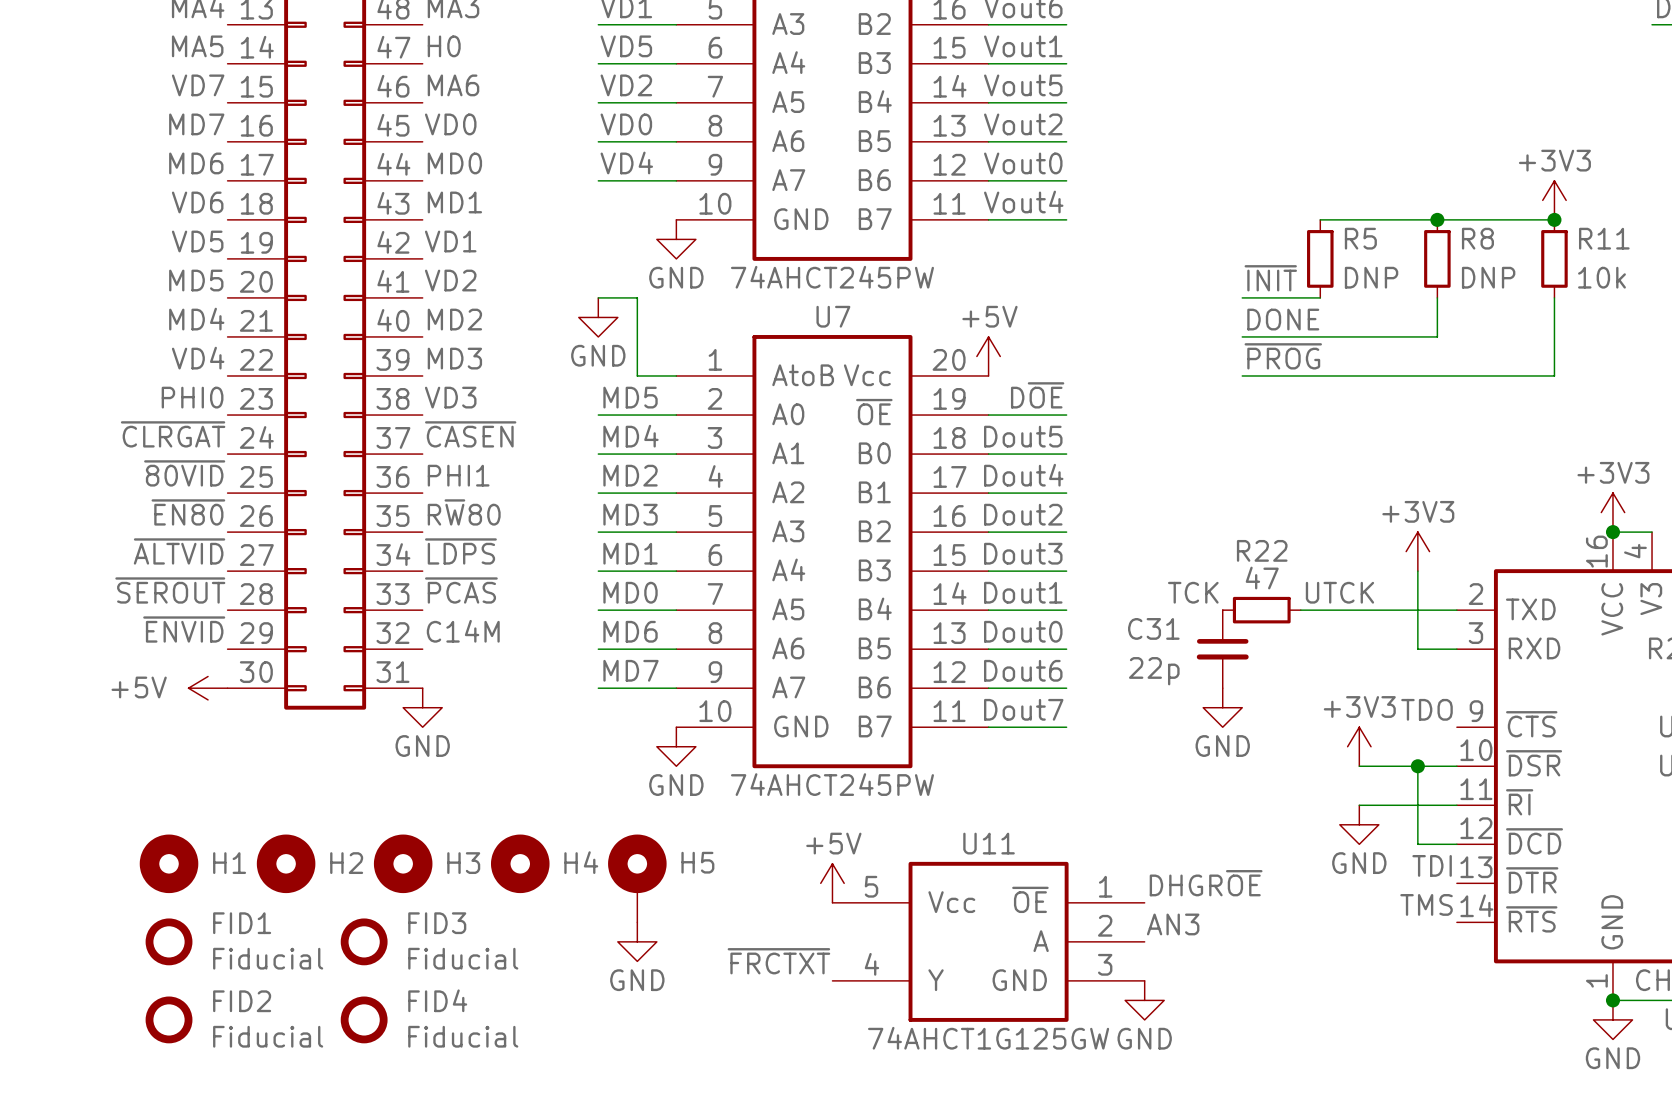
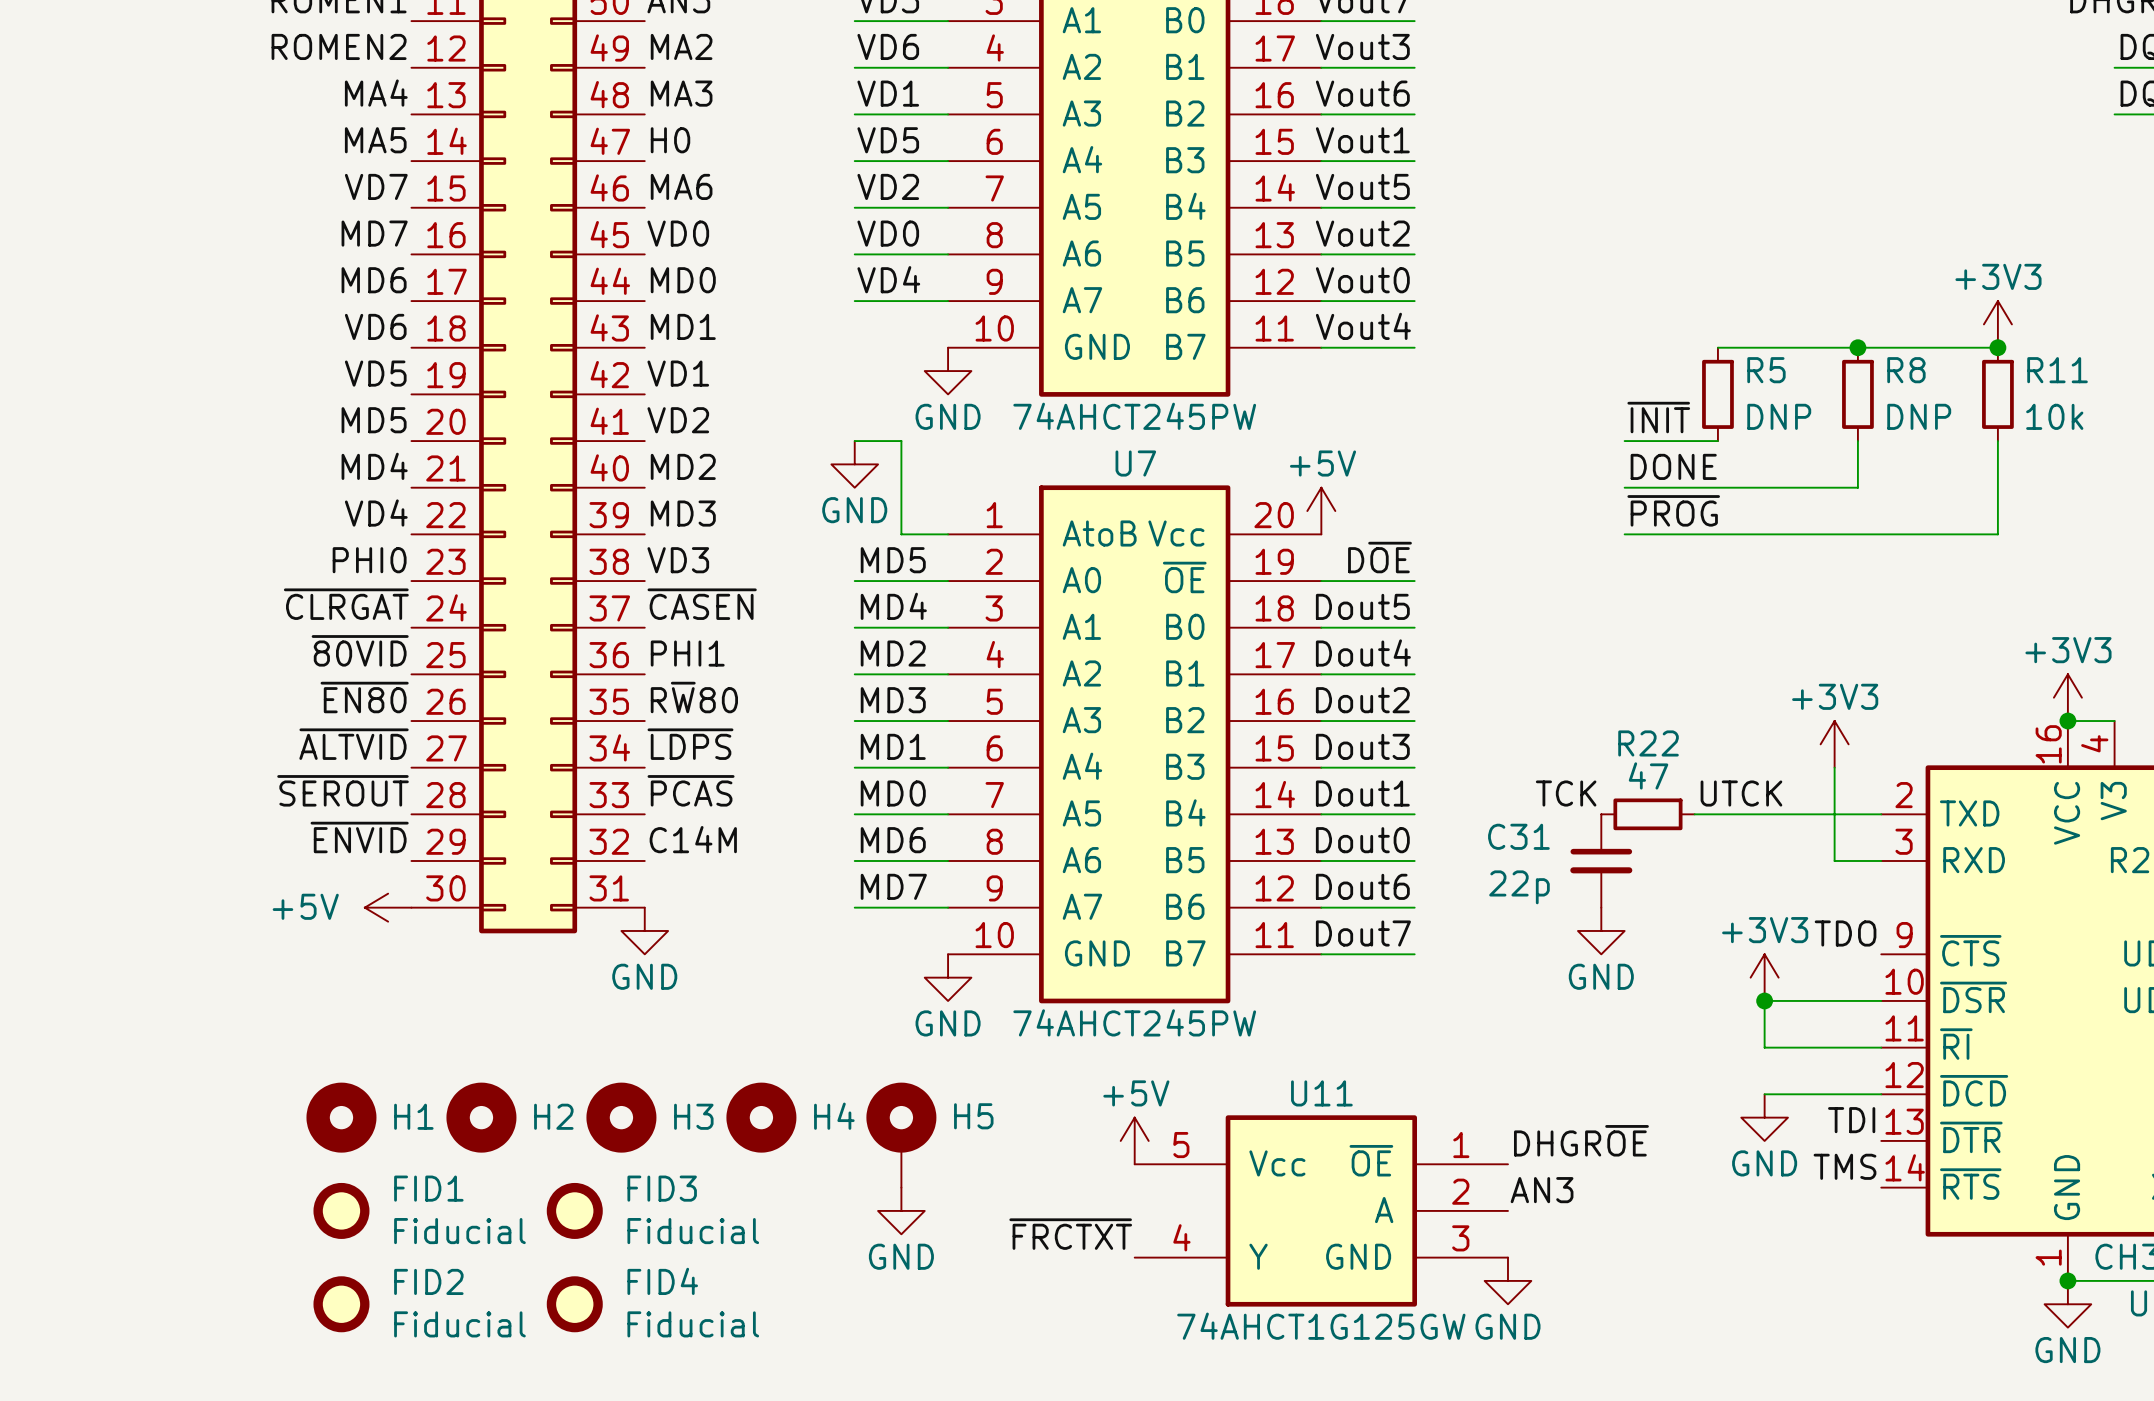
wire: none -> (1764, 1000) (1764, 1047)
wire: (1417, 766) (1417, 844) -> (1764, 1094) (1834, 1094)
junction position: (1417, 766) -> (1764, 1000)
power symbol position: GND (1359, 824) -> GND (1764, 1117)

